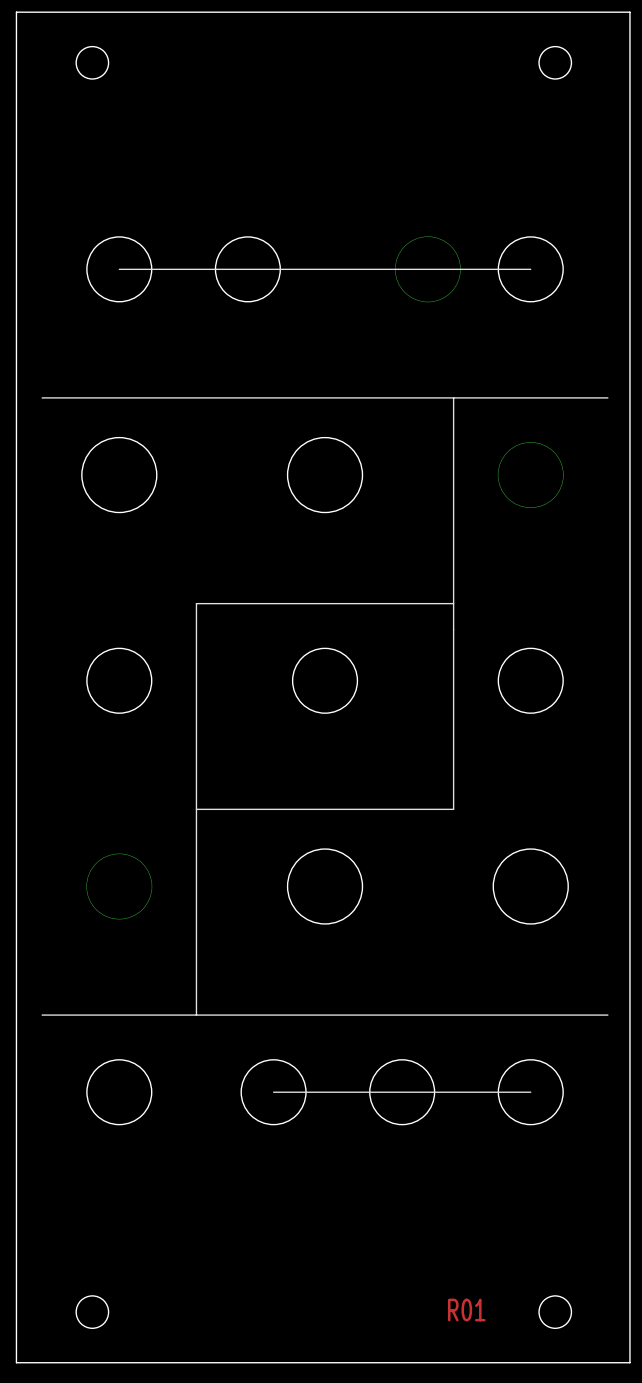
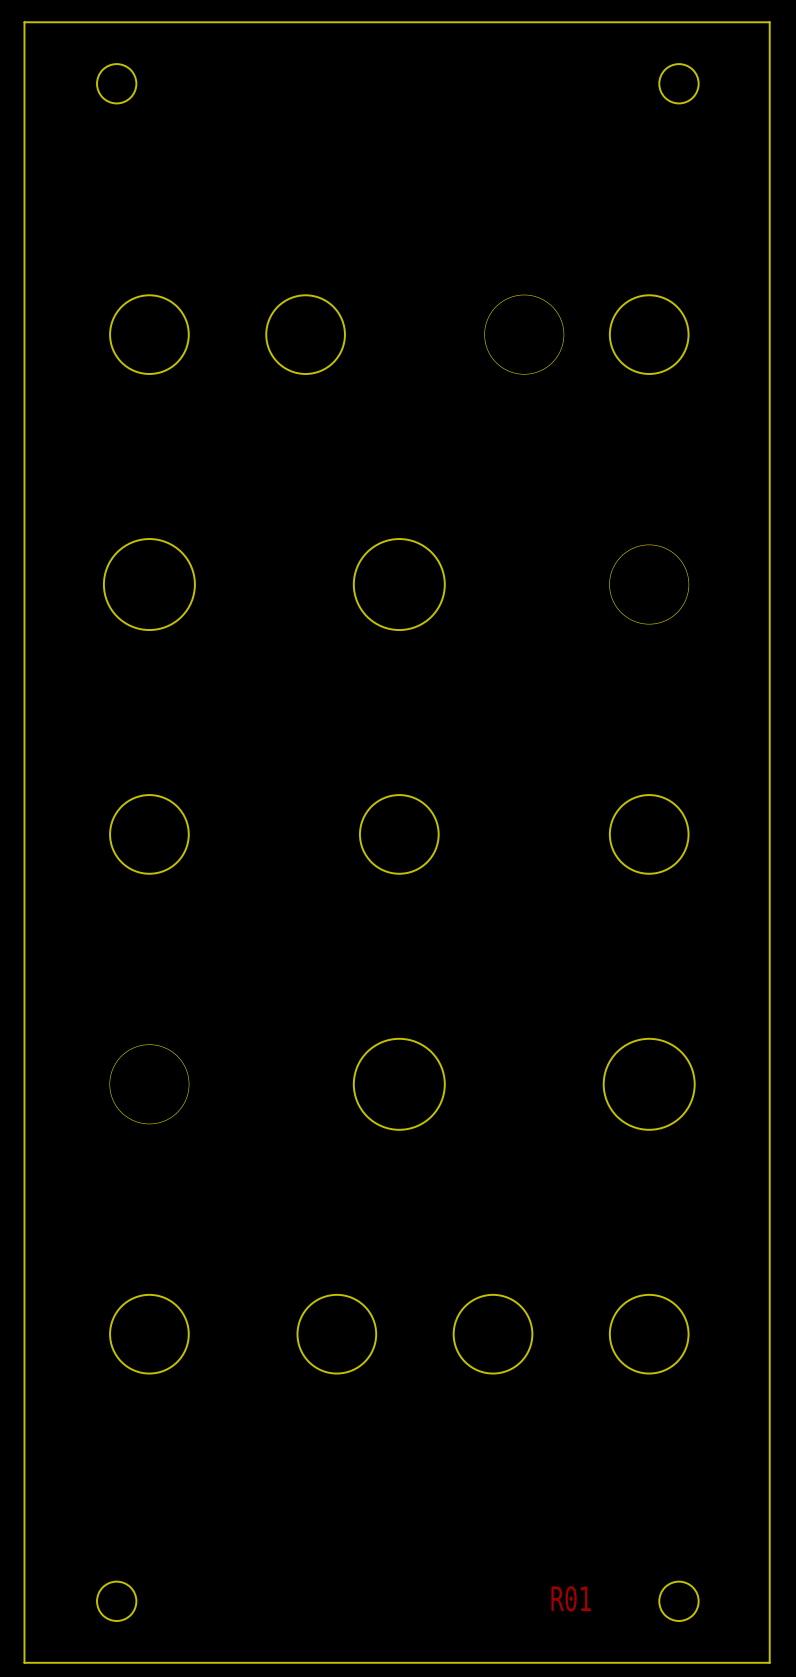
line: (119, 269) (530, 269) -> none
line: (42, 397) (607, 397) -> none
line: (453, 397) (453, 809) (196, 809) -> none
line: (453, 603) (196, 603) (196, 1015) -> none
line: (42, 1015) (607, 1015) -> none
line: (273, 1092) (530, 1092) -> none

